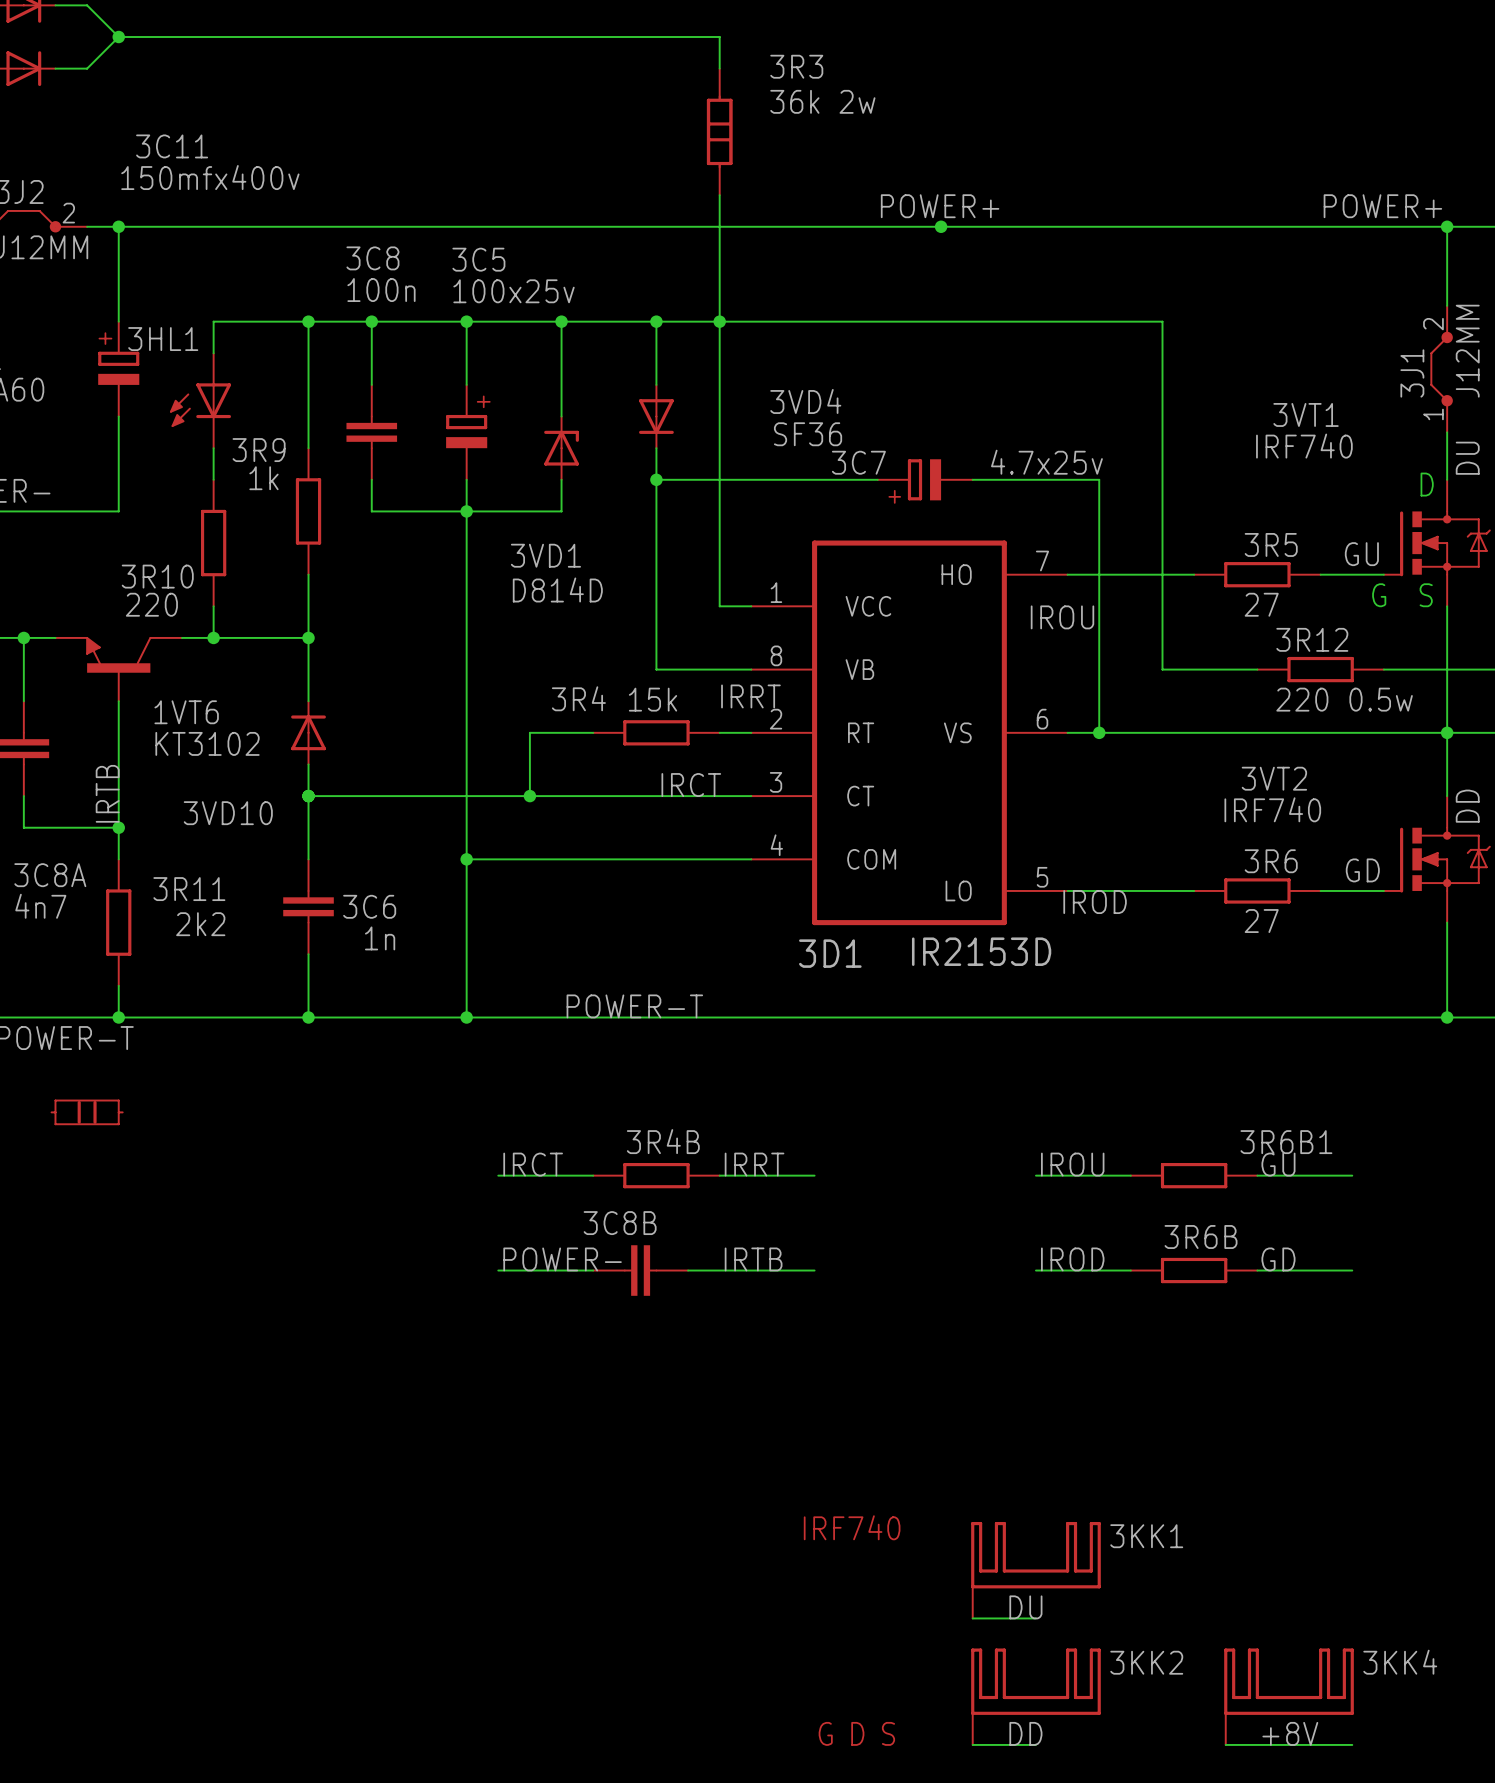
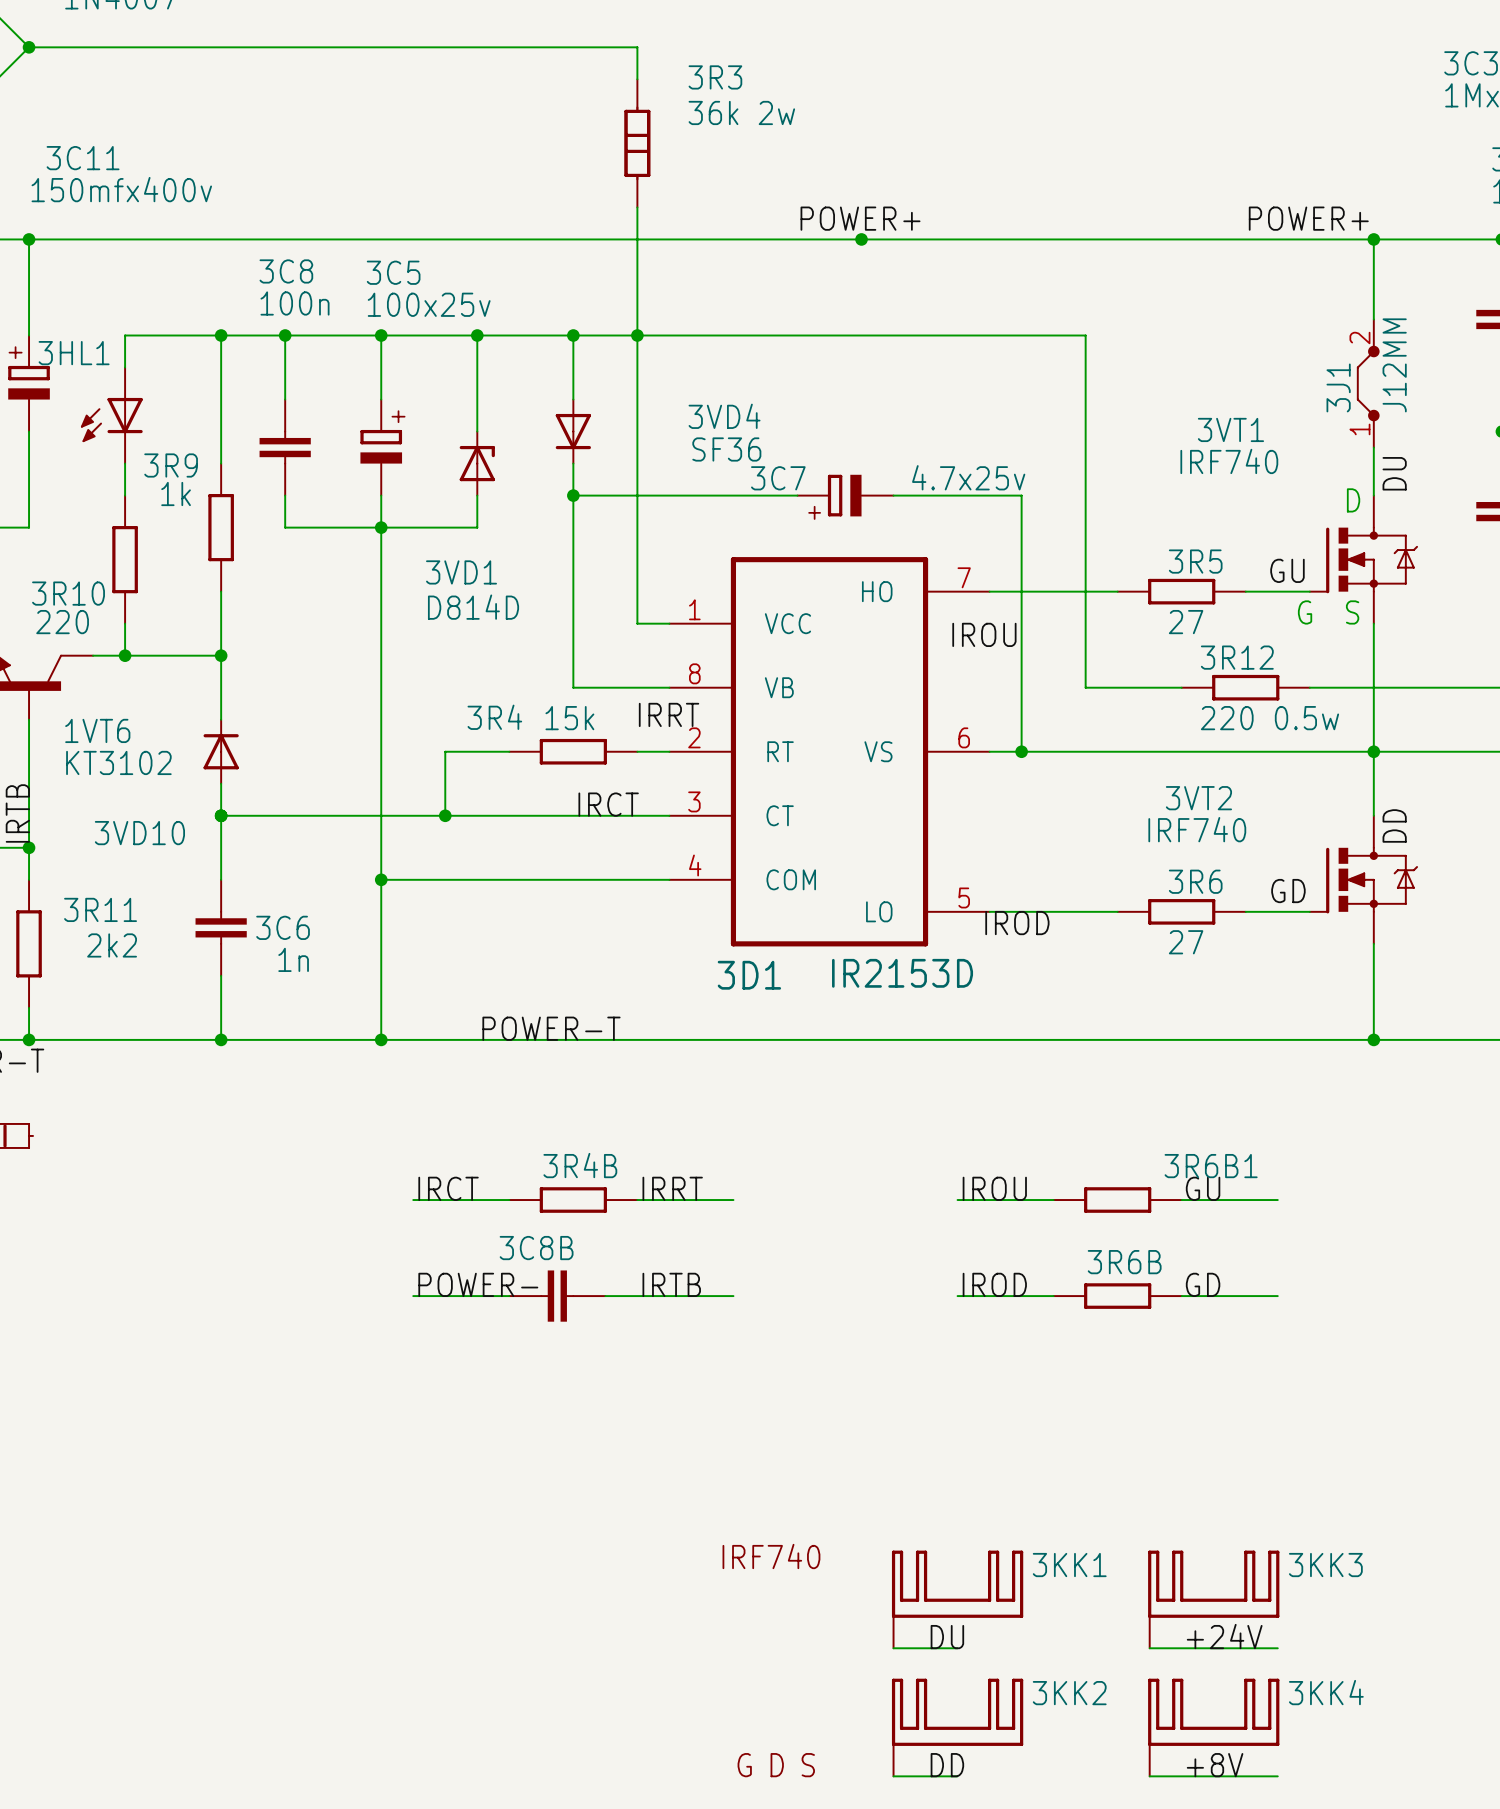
3KK3: none -> (1213, 1599)
label: none -> +24V (1224, 1636)
wire: none -> (1149, 1648) (1277, 1648)

